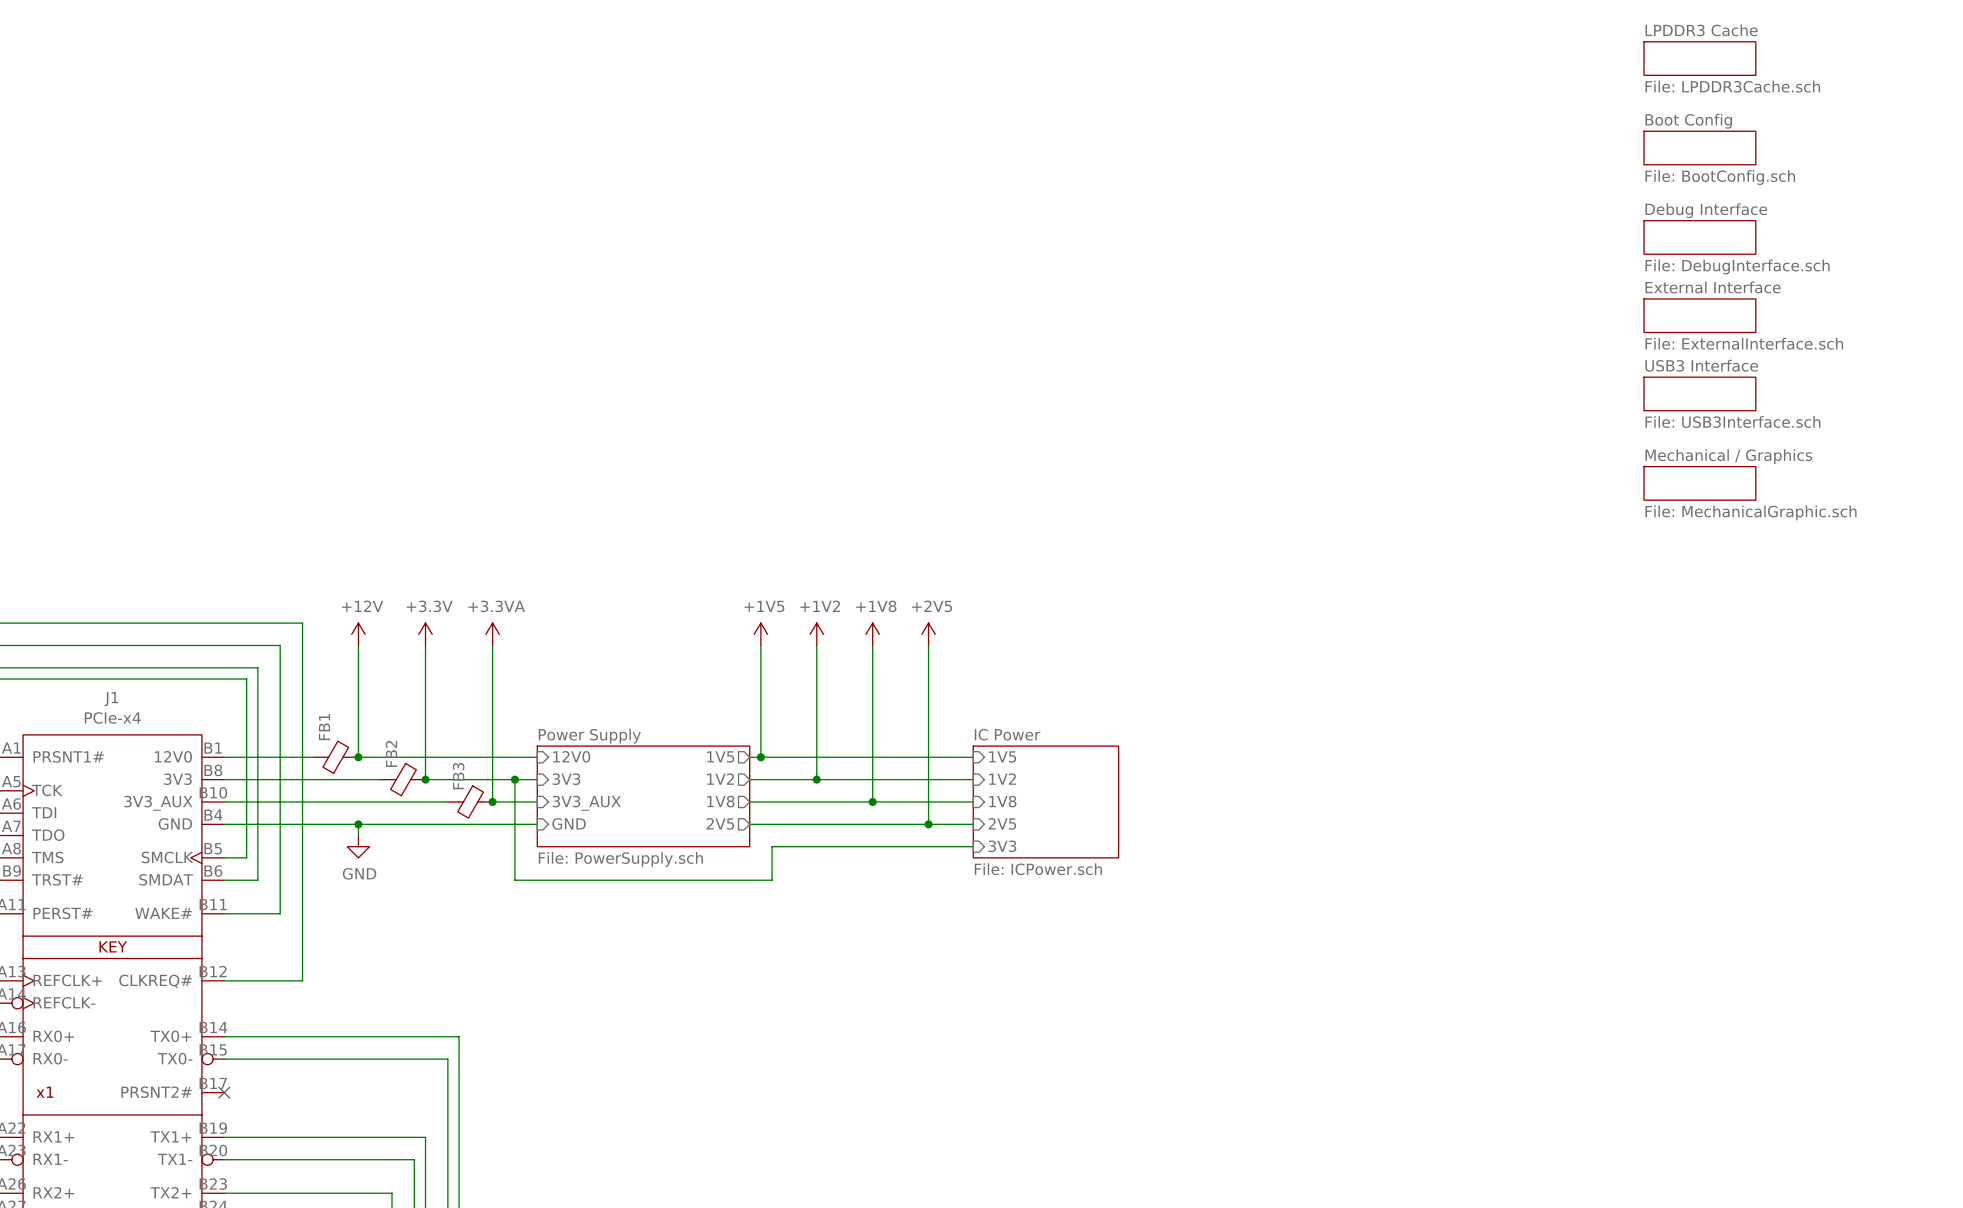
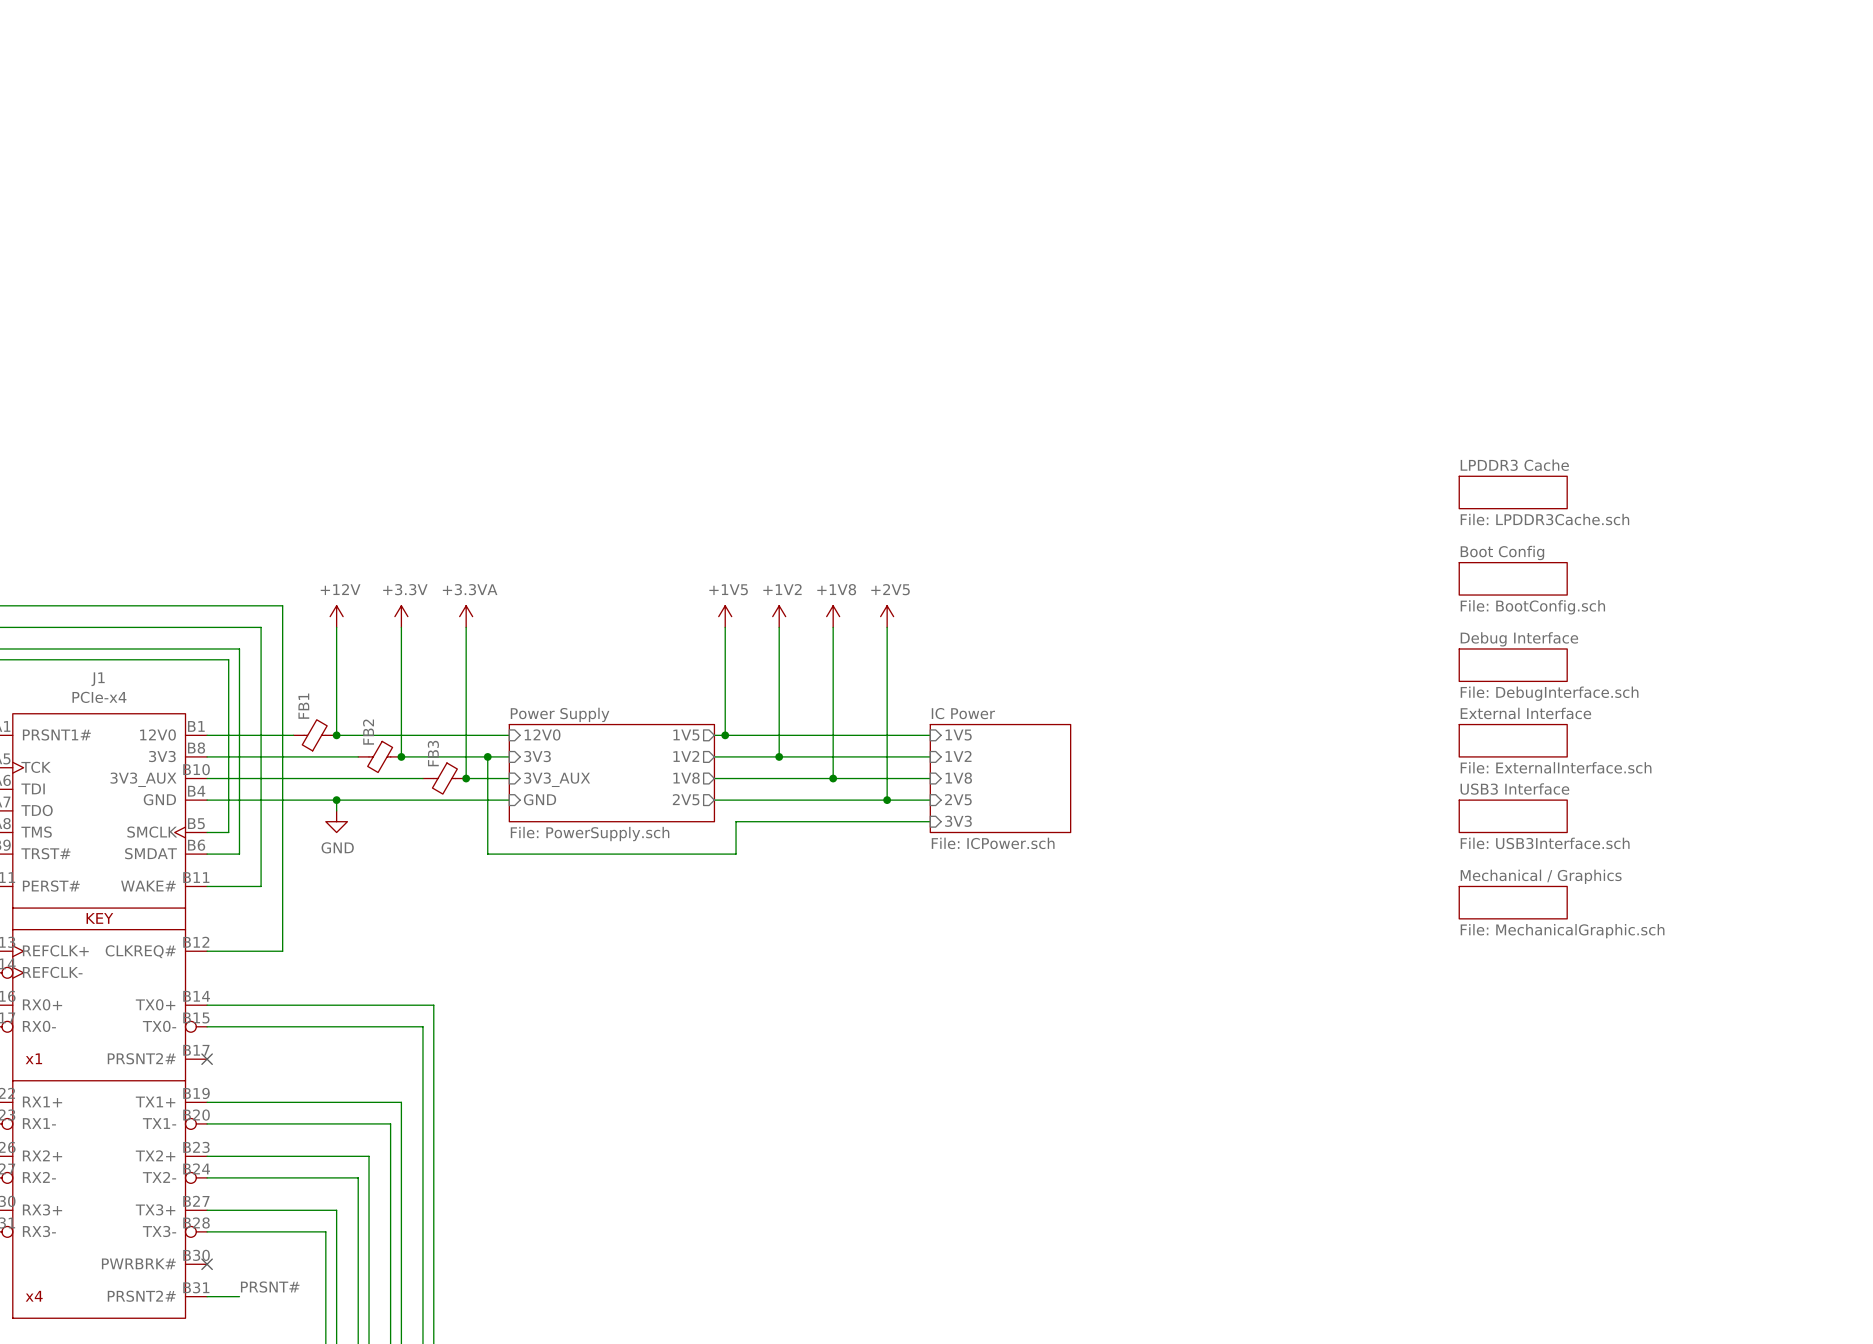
sheet LPDDR3 Cache position: (1699, 58) -> (1513, 492)
sheet Boot Config: File: BootConfig.sch (1699, 148) -> none
sheet Debug Interface: File: DebugInterface.sch (1699, 237) -> none
sheet External Interface: File: ExternalInterface.sch (1699, 315) -> none
sheet USB3 Interface position: (1699, 393) -> (1513, 816)
sheet Mechanical / Graphics: File: MechanicalGraphic.sch (1699, 483) -> none
sheet Boot Config: none -> File: BootConfig.sch (1513, 578)
sheet Debug Interface: none -> File: DebugInterface.sch (1513, 665)
sheet External Interface: none -> File: ExternalInterface.sch (1513, 740)
sheet Mechanical / Graphics: none -> File: MechanicalGraphic.sch (1513, 902)

